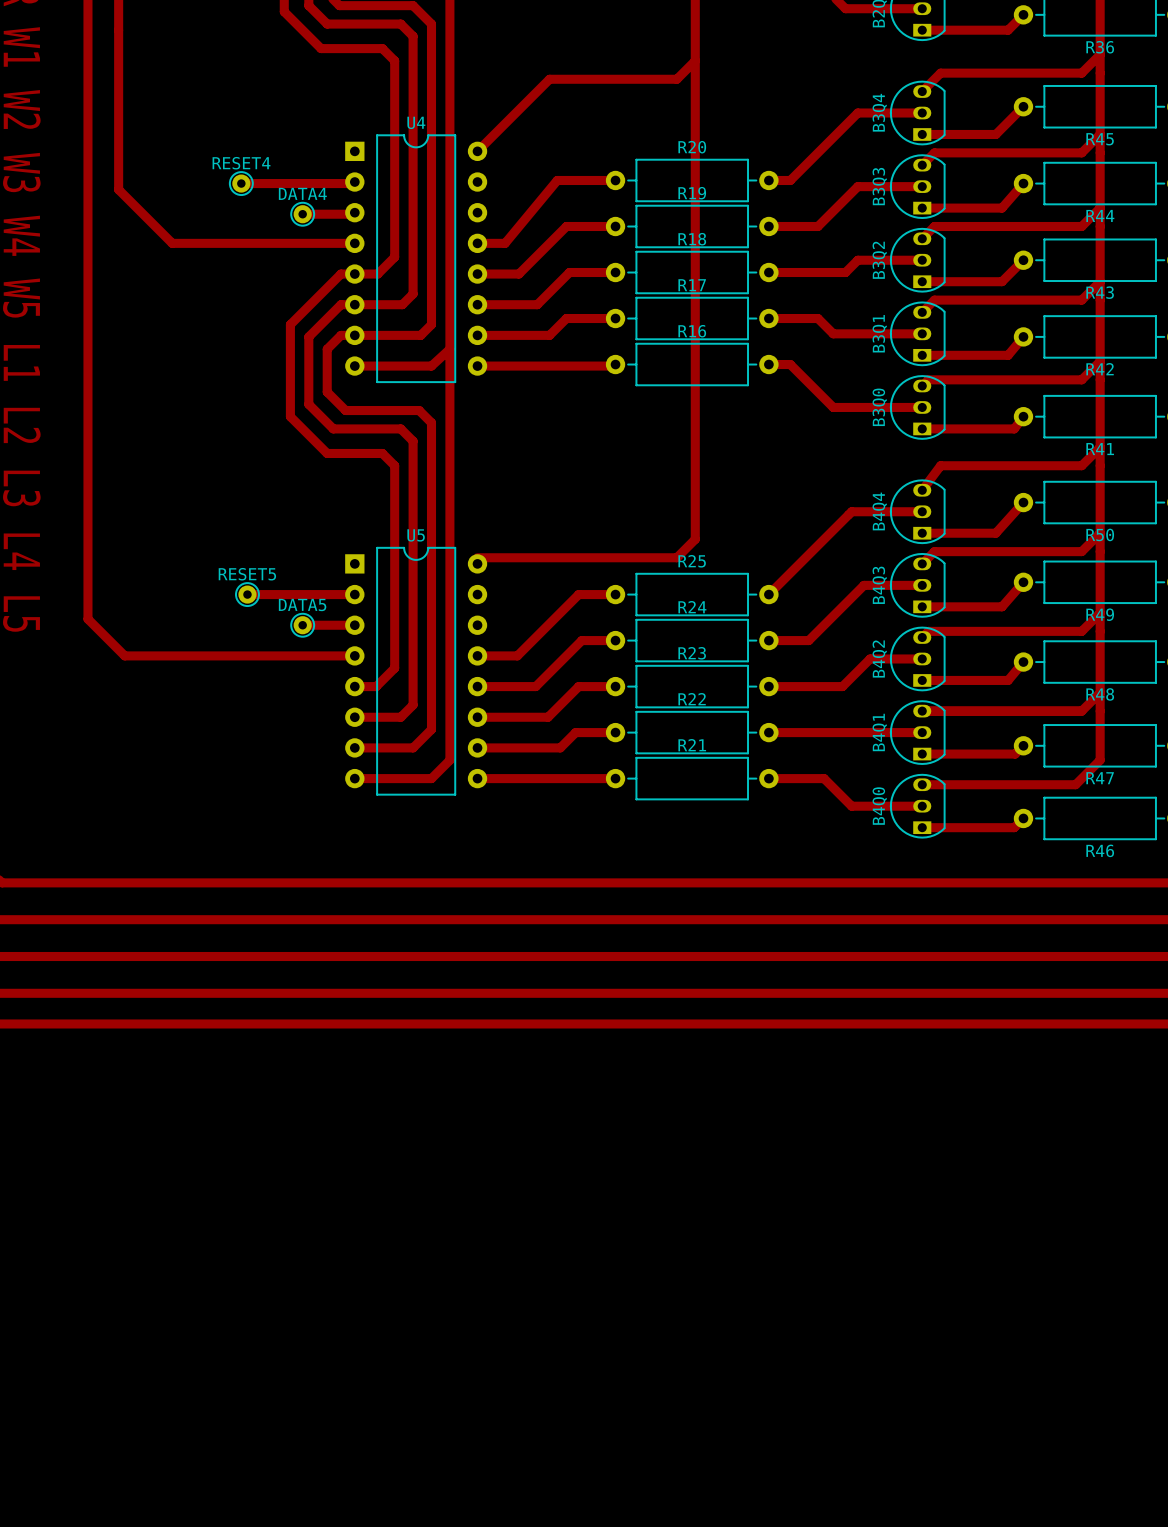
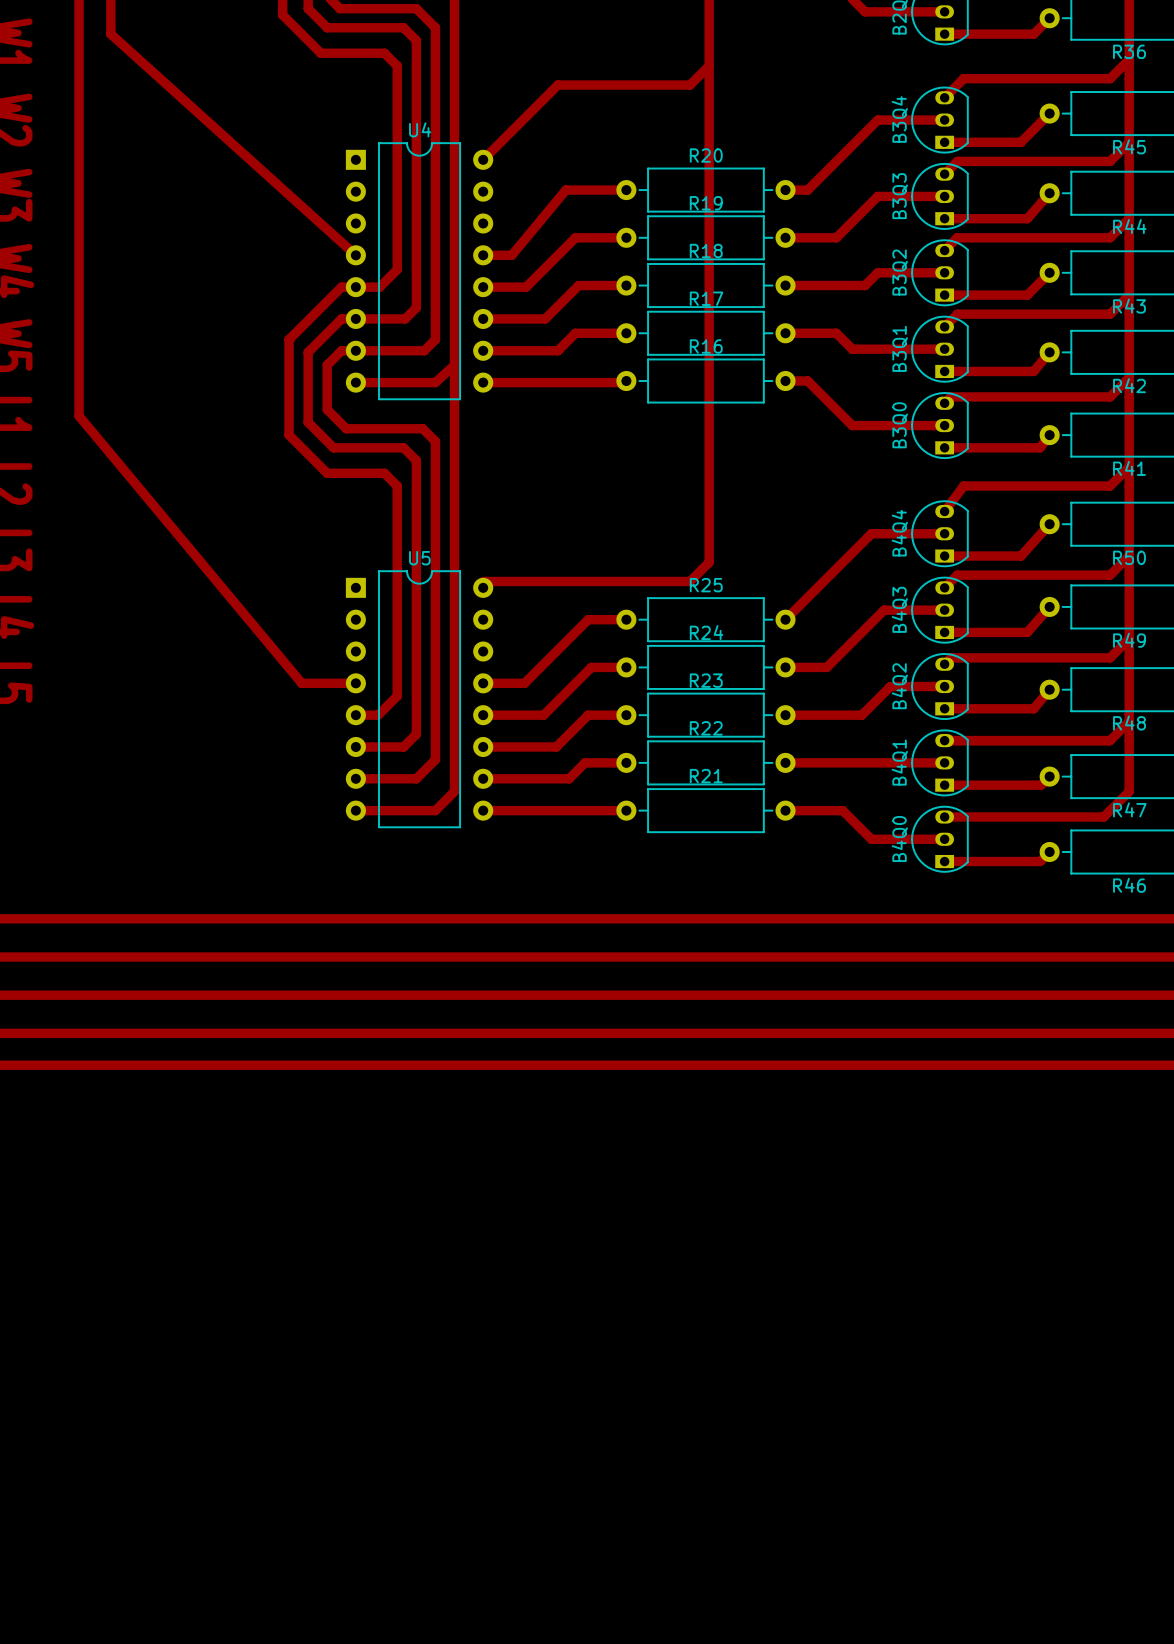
top track: (118, 30) (118, 189) (172, 243) (354, 243) -> (110, 34) (355, 255)
top track: (354, 182) (353, 183) (241, 183) -> none
RESET4: (241, 183) -> none
top track: (354, 212) (302, 214) -> none
DATA4: (302, 214) -> none
top track: (87, 398) (87, 619) (124, 655) (302, 655) -> (79, 416) (301, 683)
top track: (247, 594) (354, 594) -> none
RESET5: (247, 594) -> none
top track: (302, 625) (354, 625) -> none
DATA5: (302, 625) -> none

